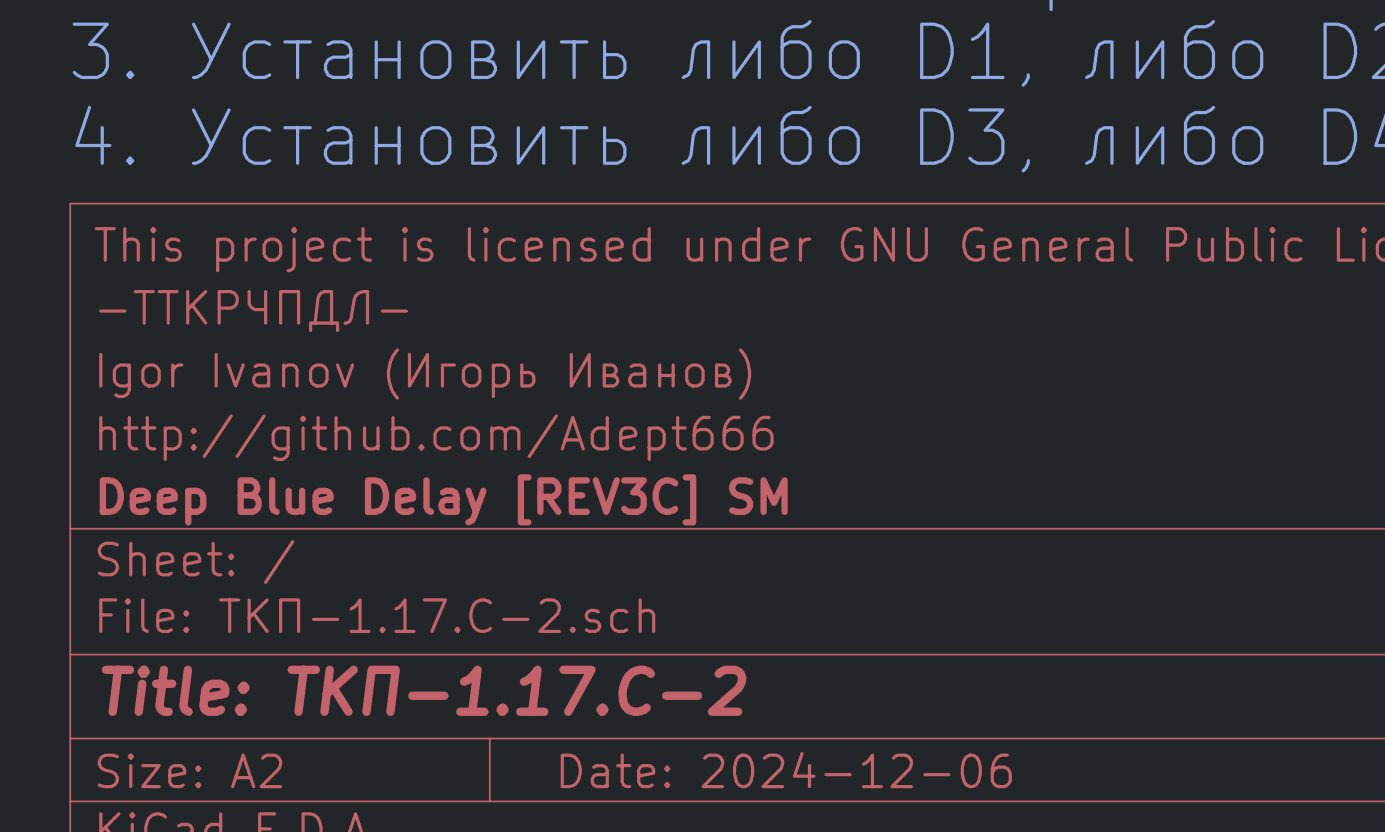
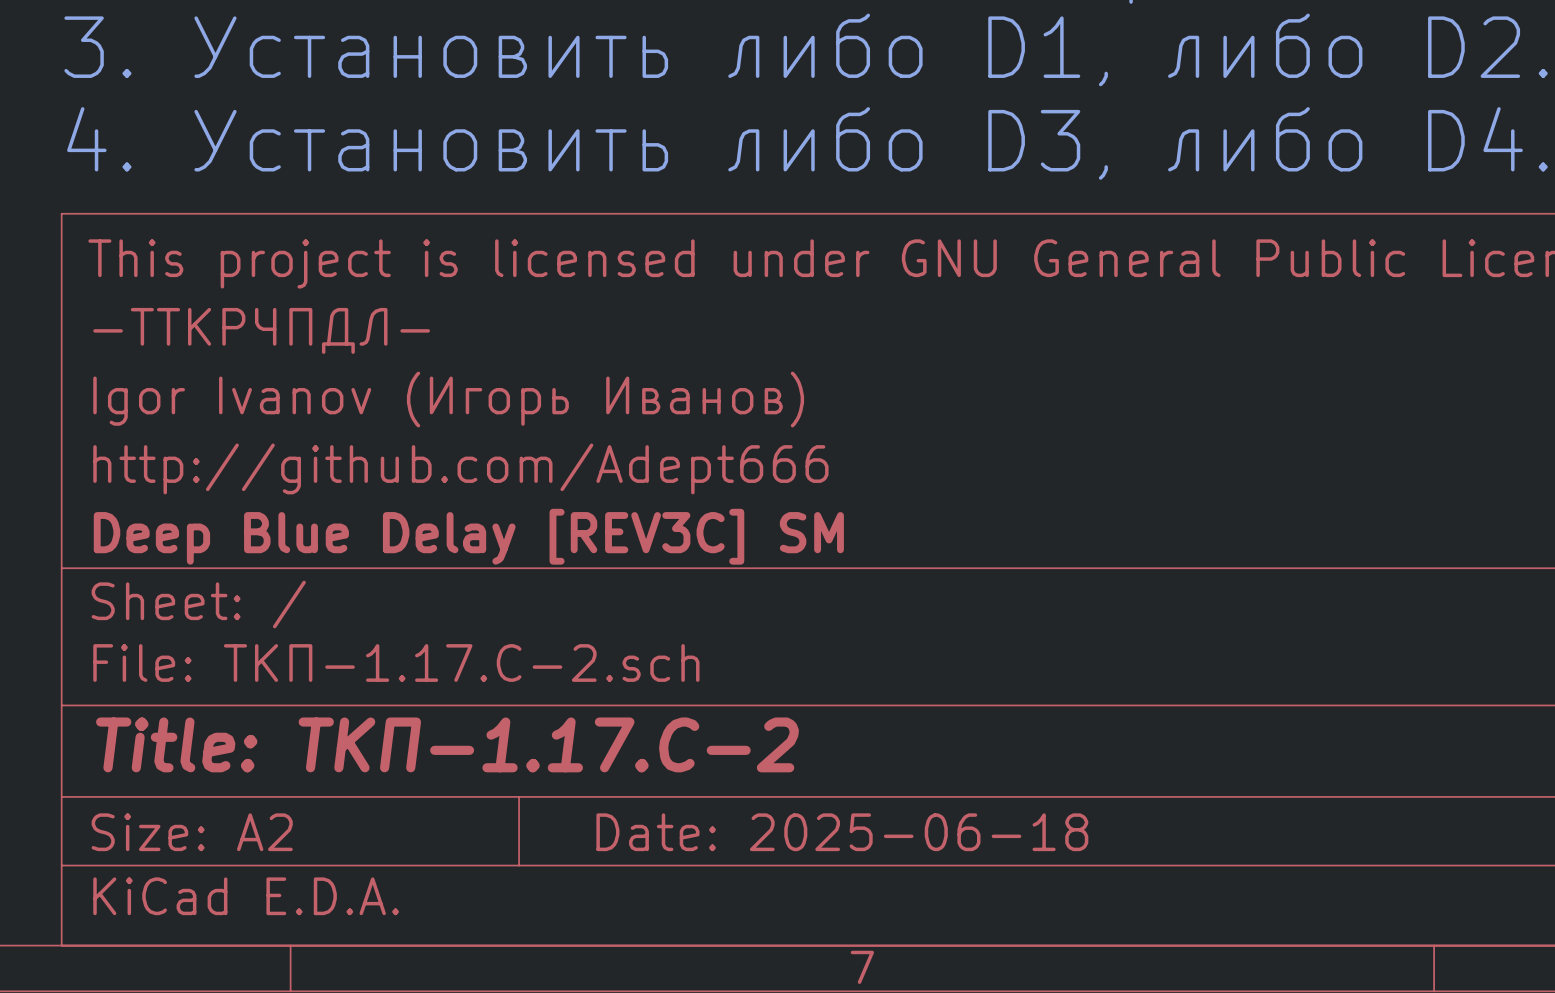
title block: Date: 2024-12-06 (786, 770) -> Date: 2025-06-18 (842, 832)

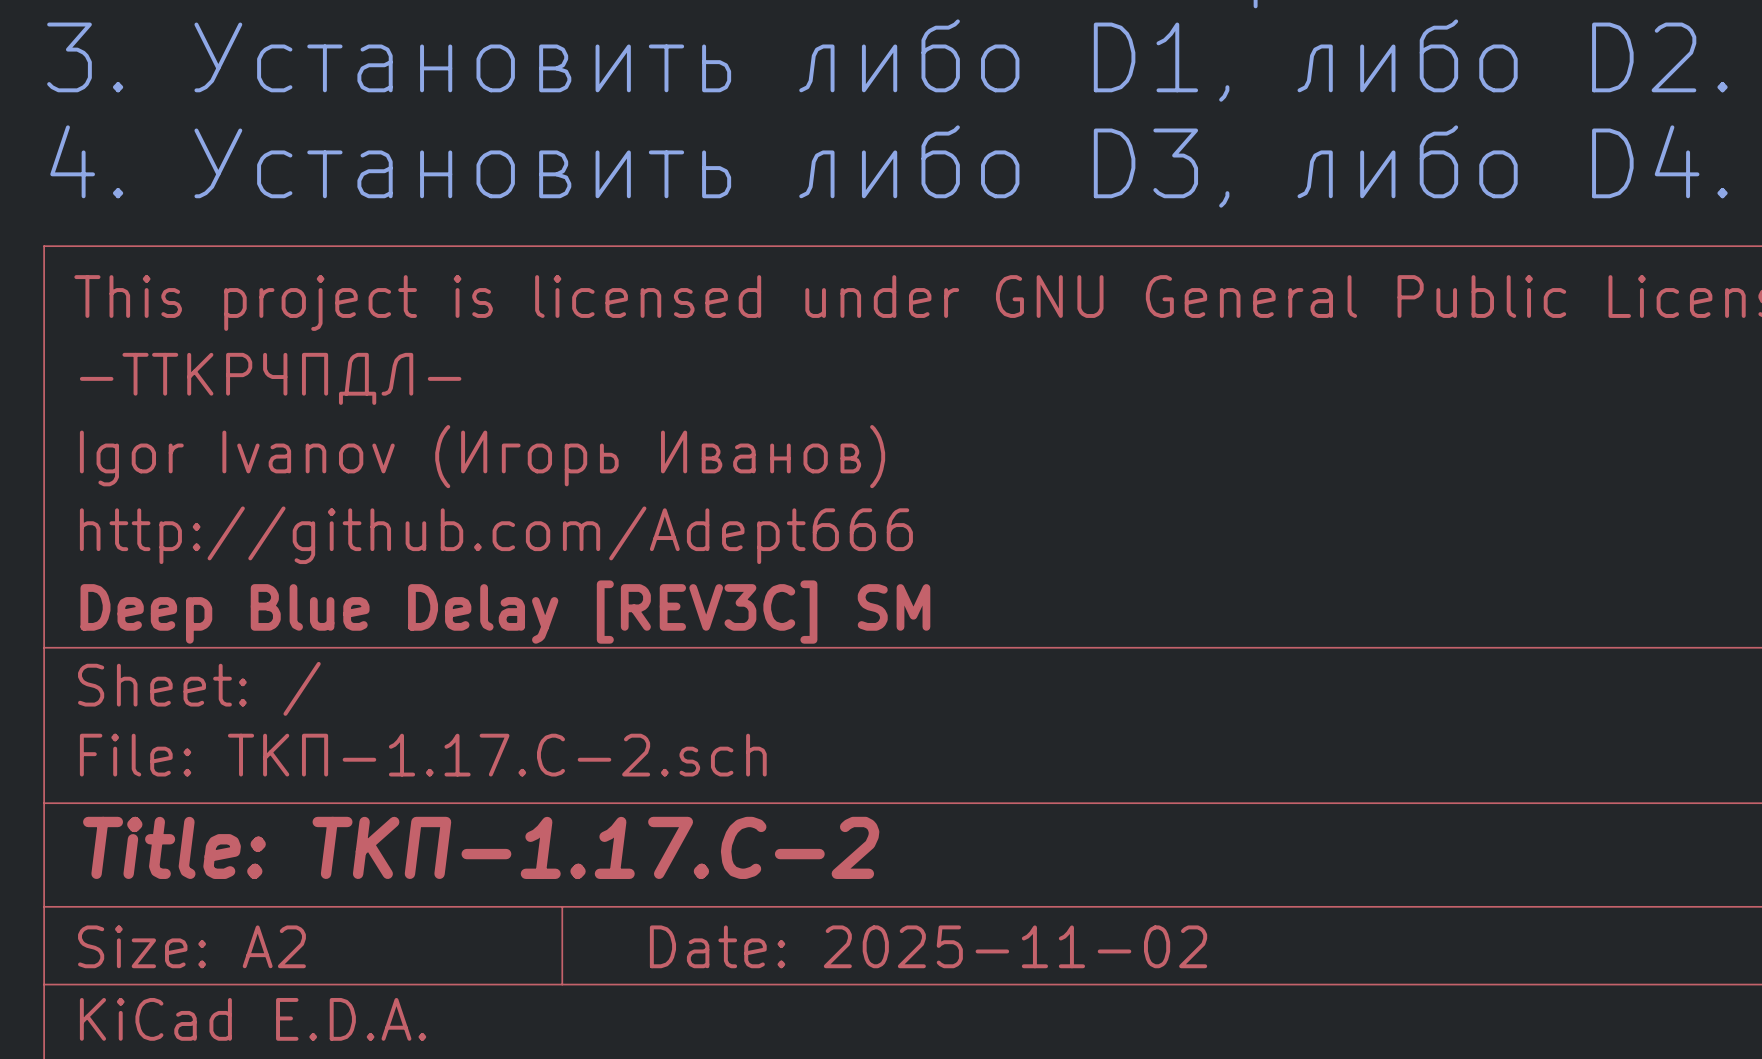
title block: Date: 2025-06-18 (842, 832) -> Date: 2025-11-02 (928, 946)

